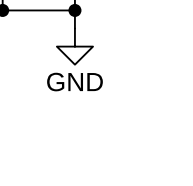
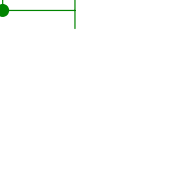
junction: (74, 10) -> none
power symbol: GND (74, 46) -> none

